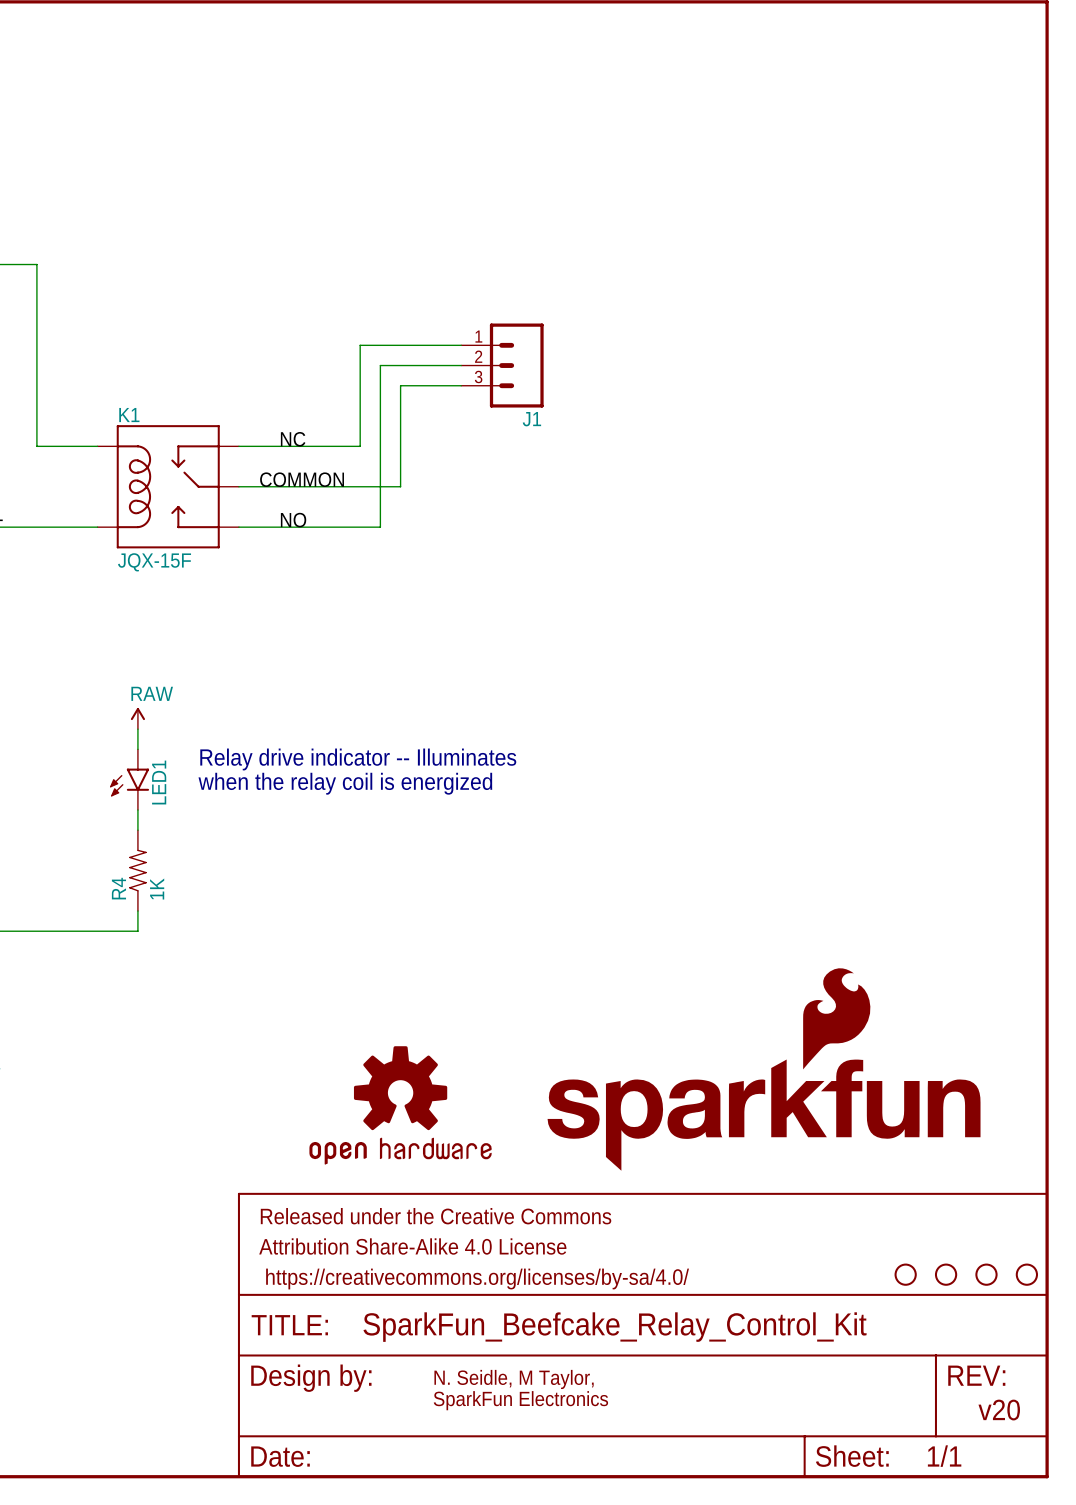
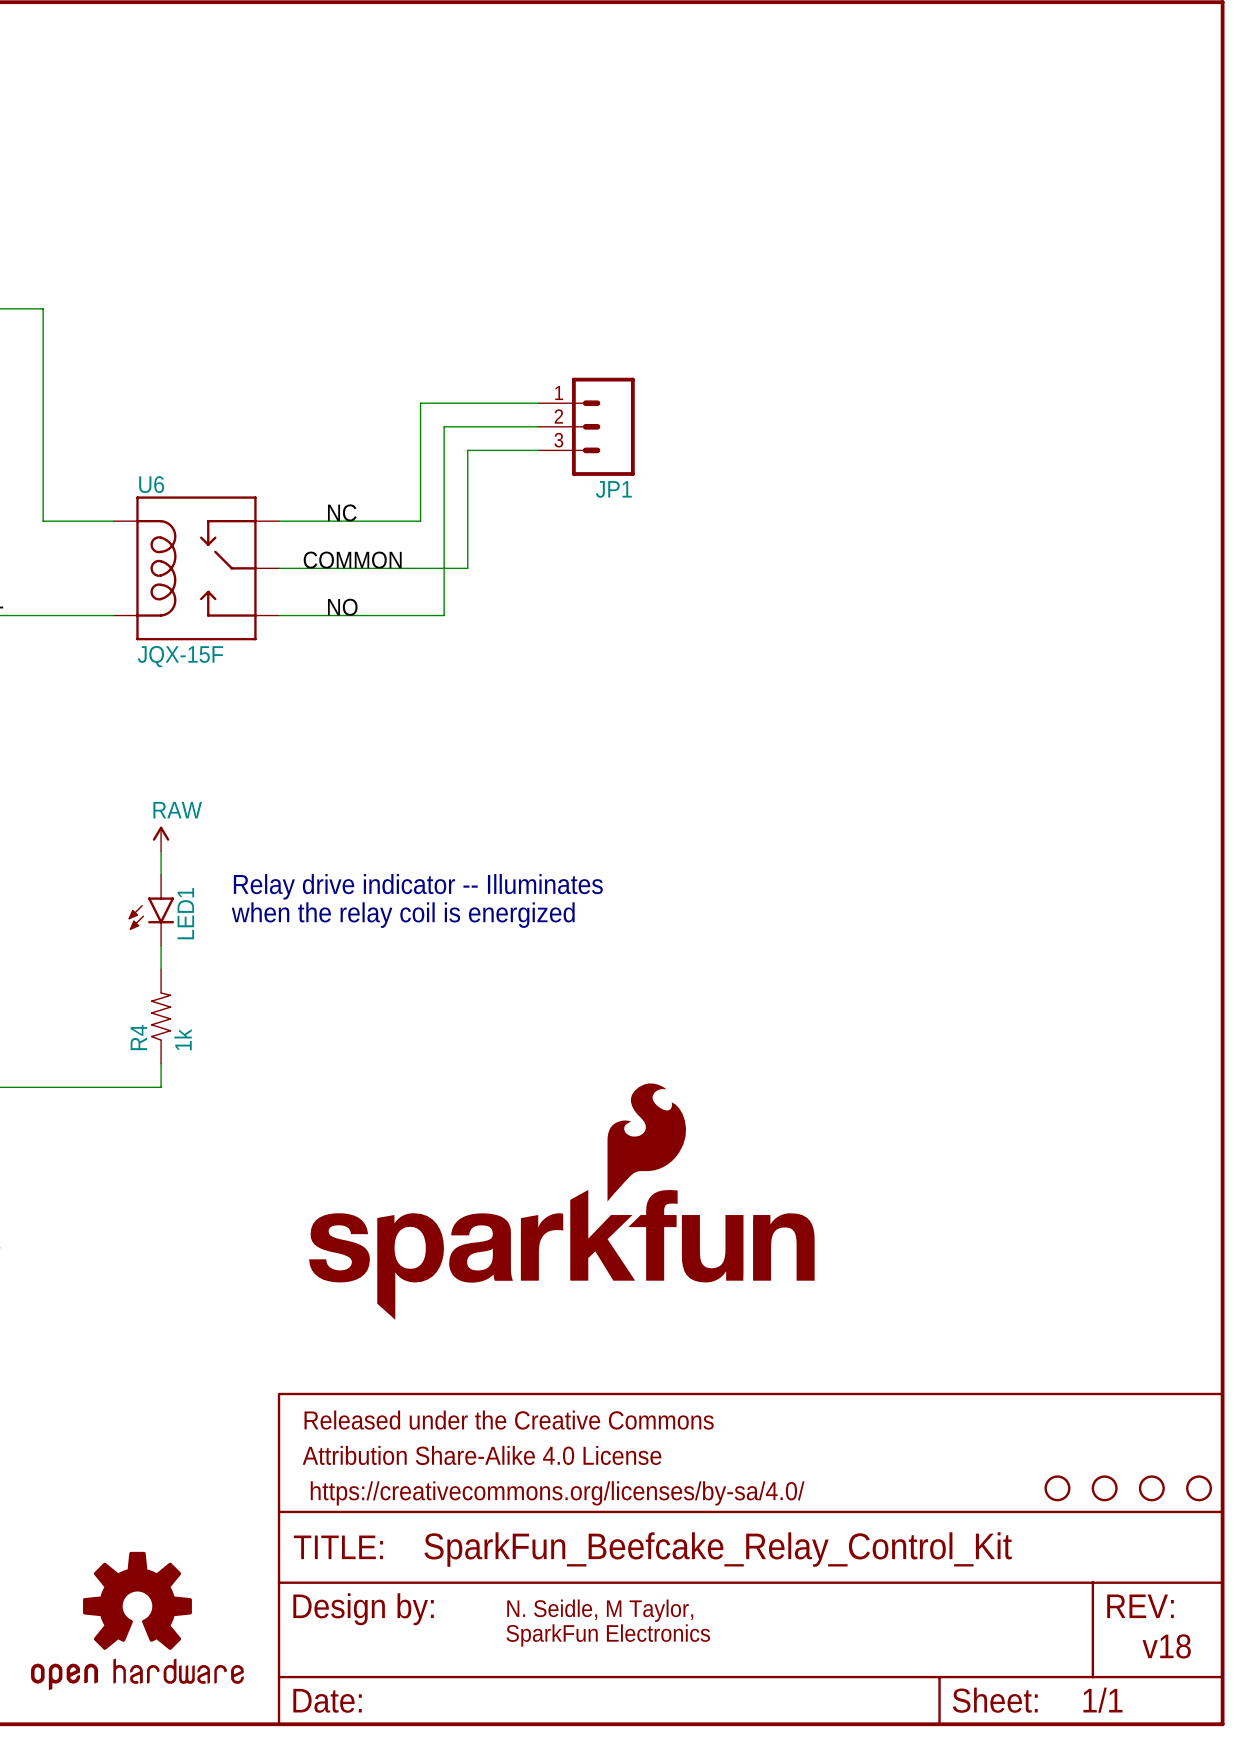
K1 name: K1 (129, 415) -> U6 (151, 484)
J1 name: J1 (531, 419) -> JP1 (613, 489)
R4 value: 1K (157, 889) -> 1k (183, 1039)
part: none -> (561, 1201)
part: (764, 1069) -> none
part: (400, 1105) -> none
part: none -> (137, 1620)
text: v20 (999, 1410) -> v18 (1166, 1646)

